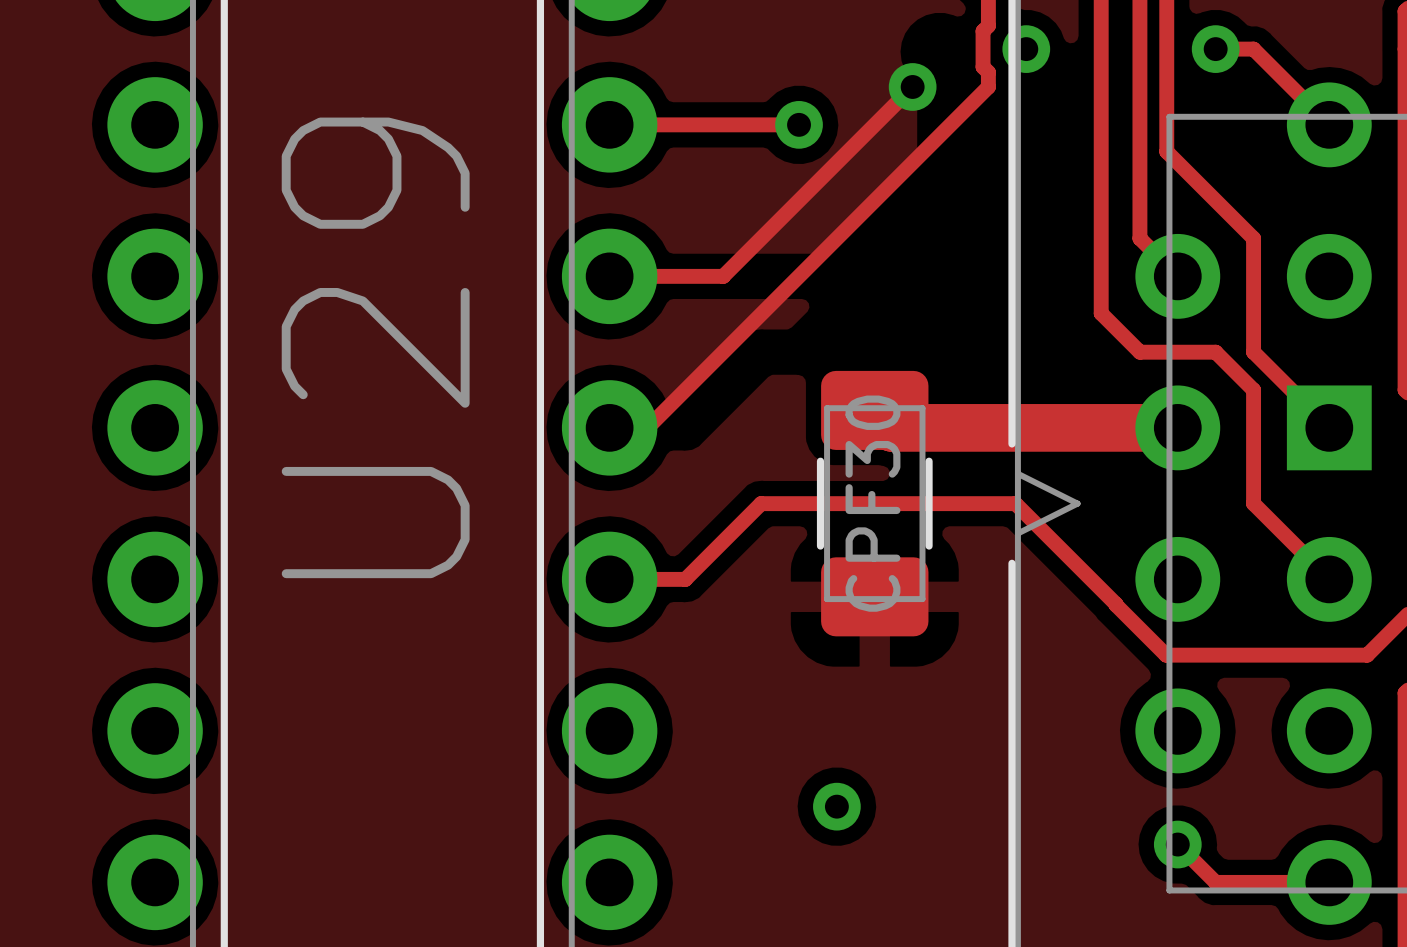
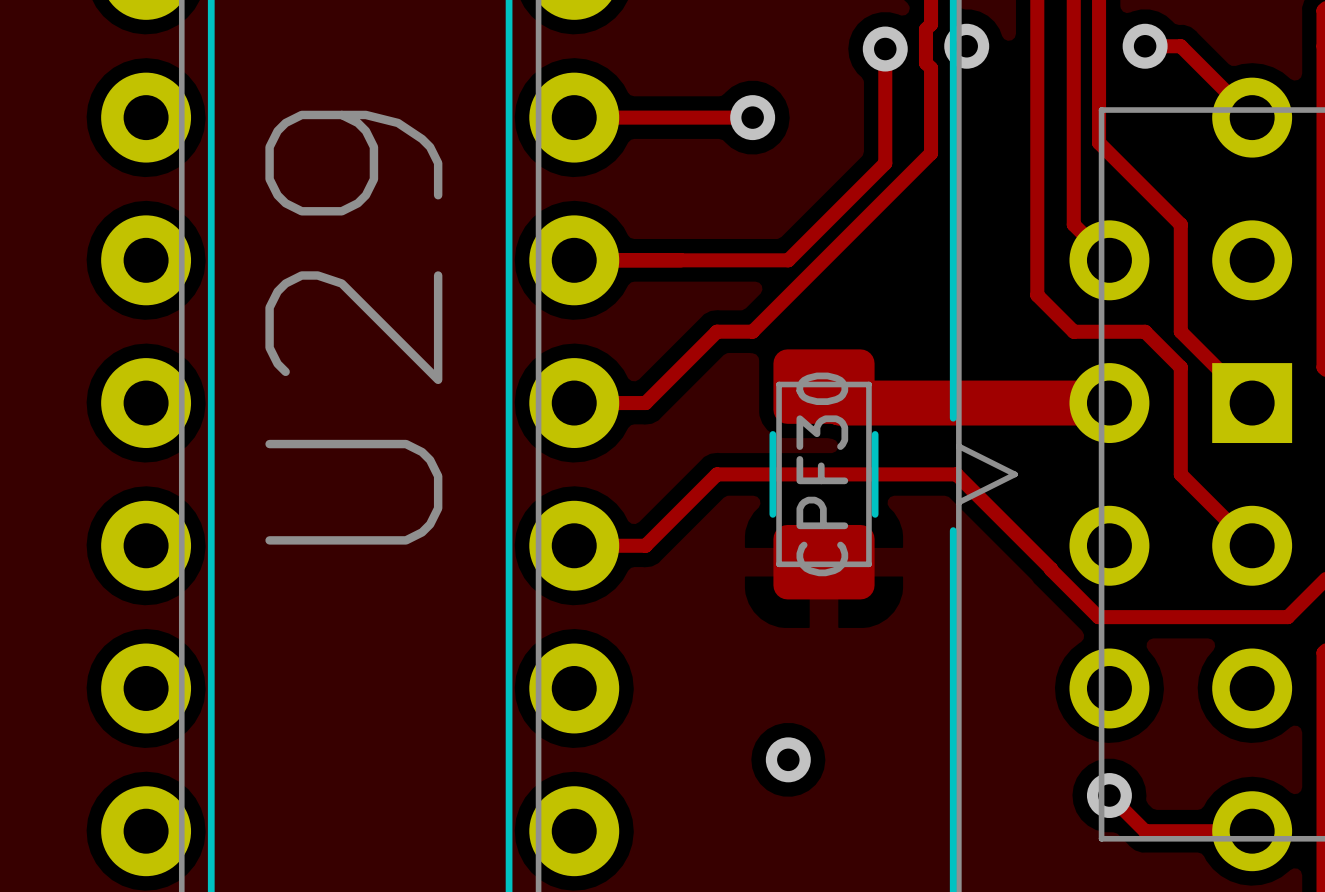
track: (912, 86) (723, 276) -> (885, 49) (885, 163) (788, 260) (681, 260)
via position: (912, 86) -> (885, 49)
track: (988, 86) (647, 427) -> (931, 81) (931, 153) (752, 331) (716, 331) (645, 403) (609, 403)

